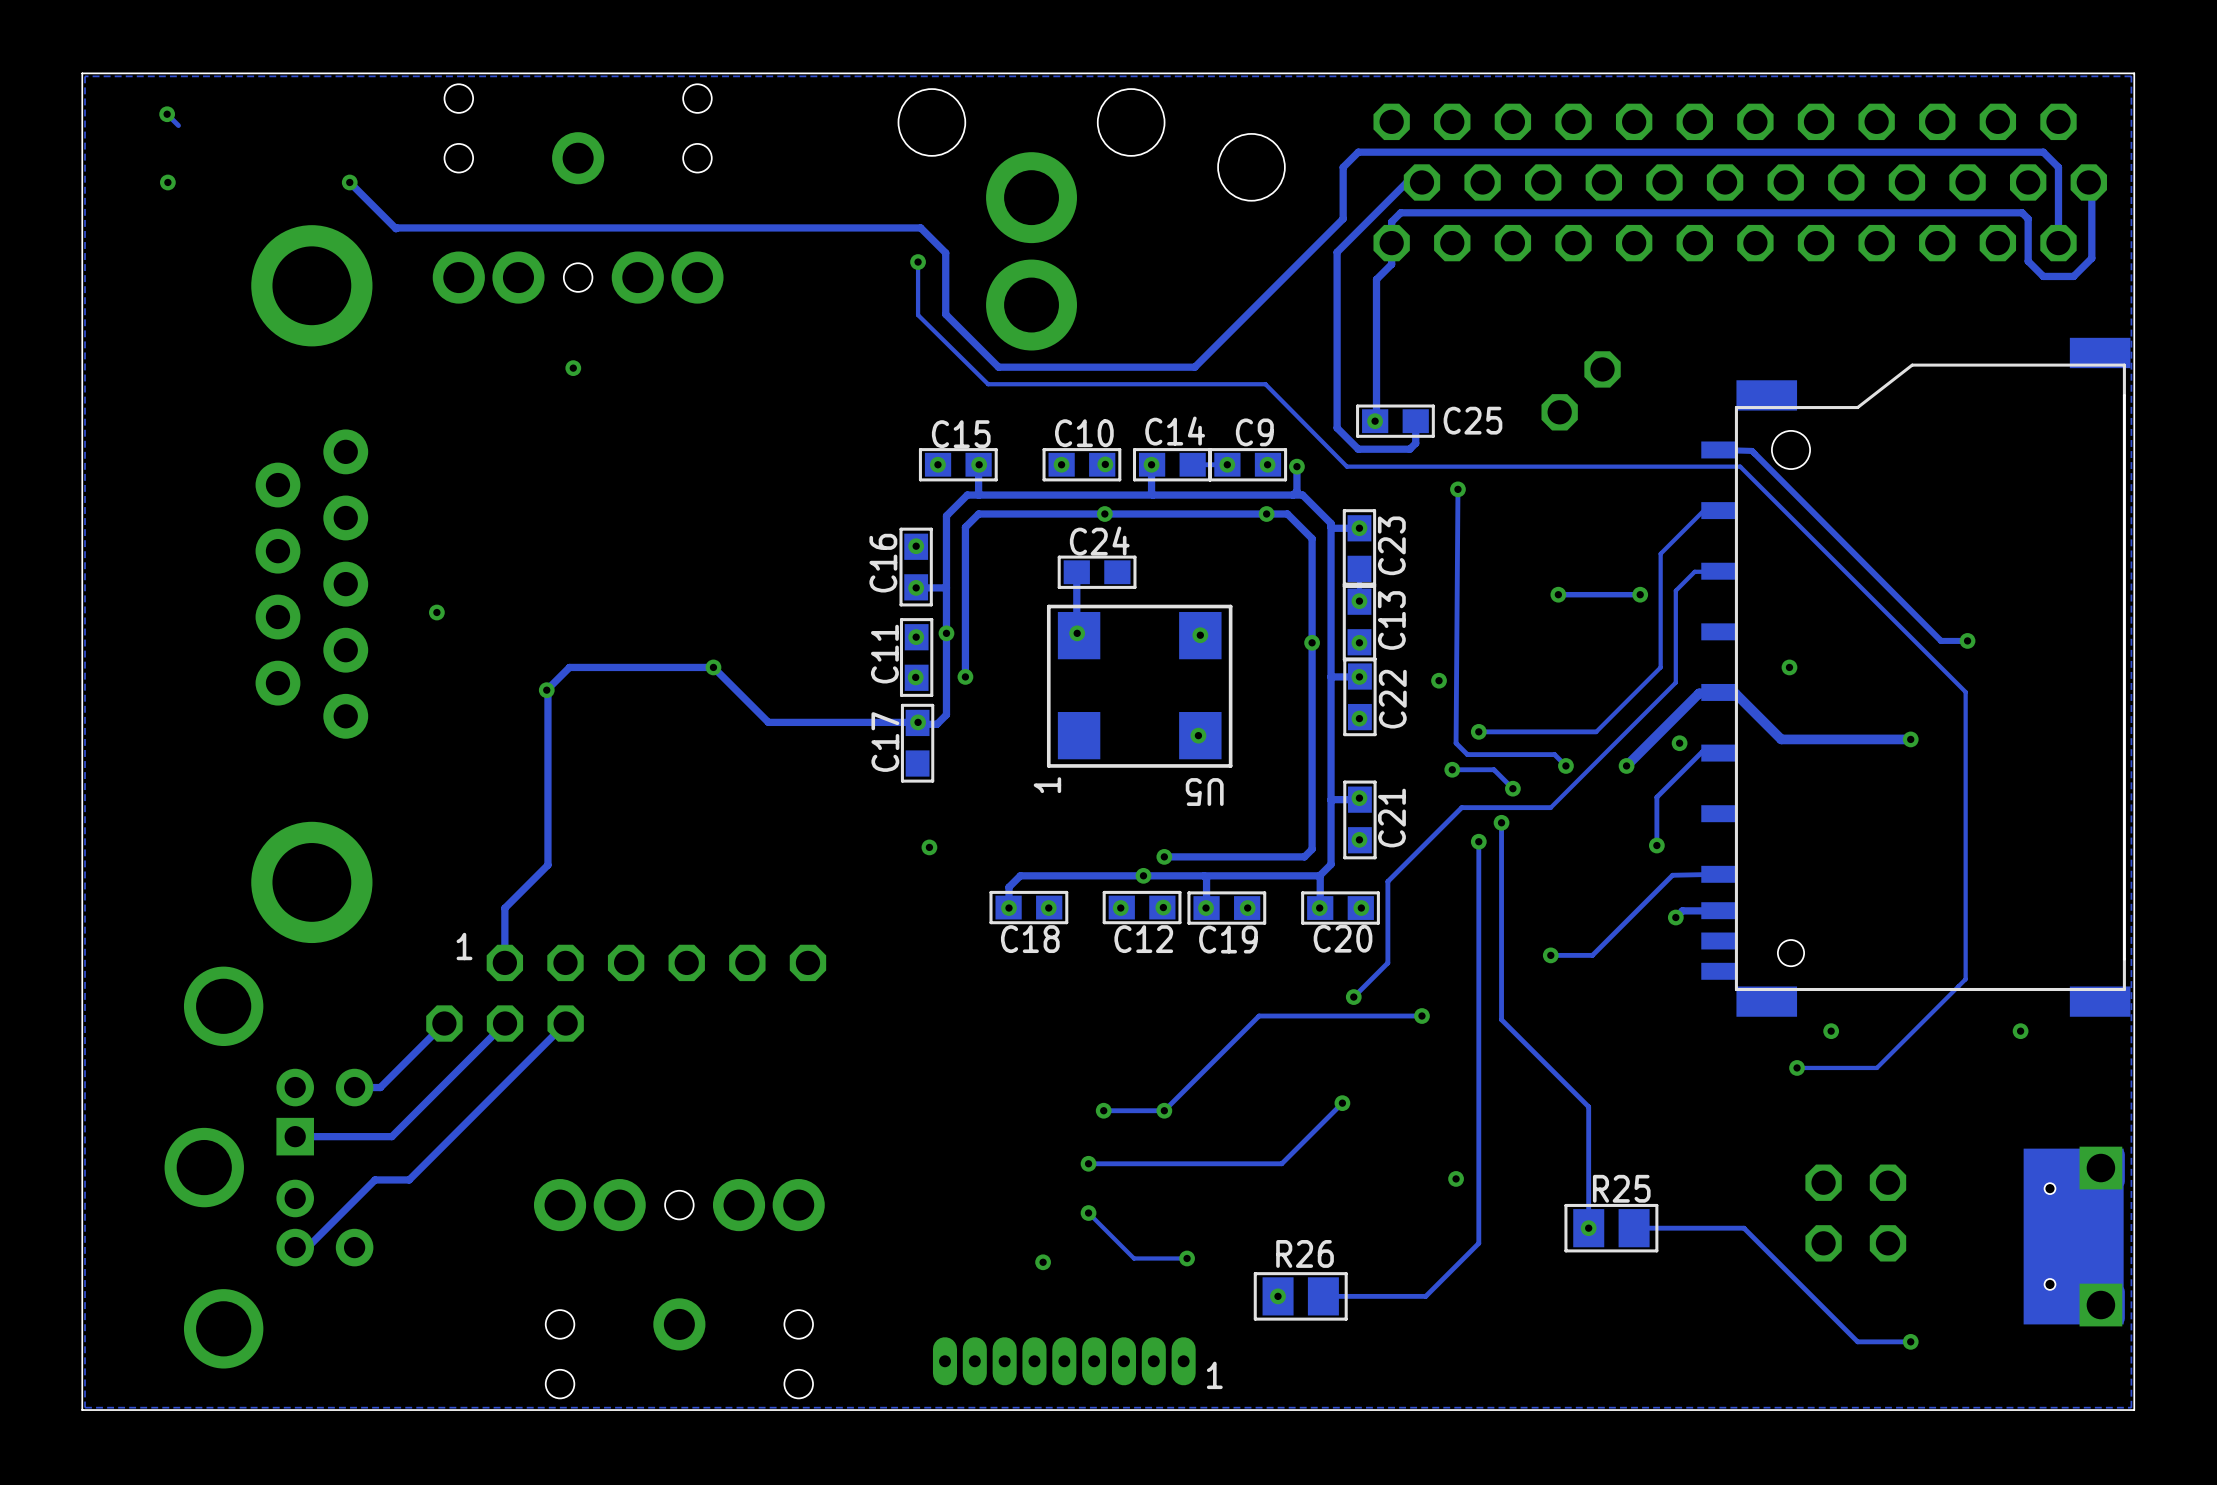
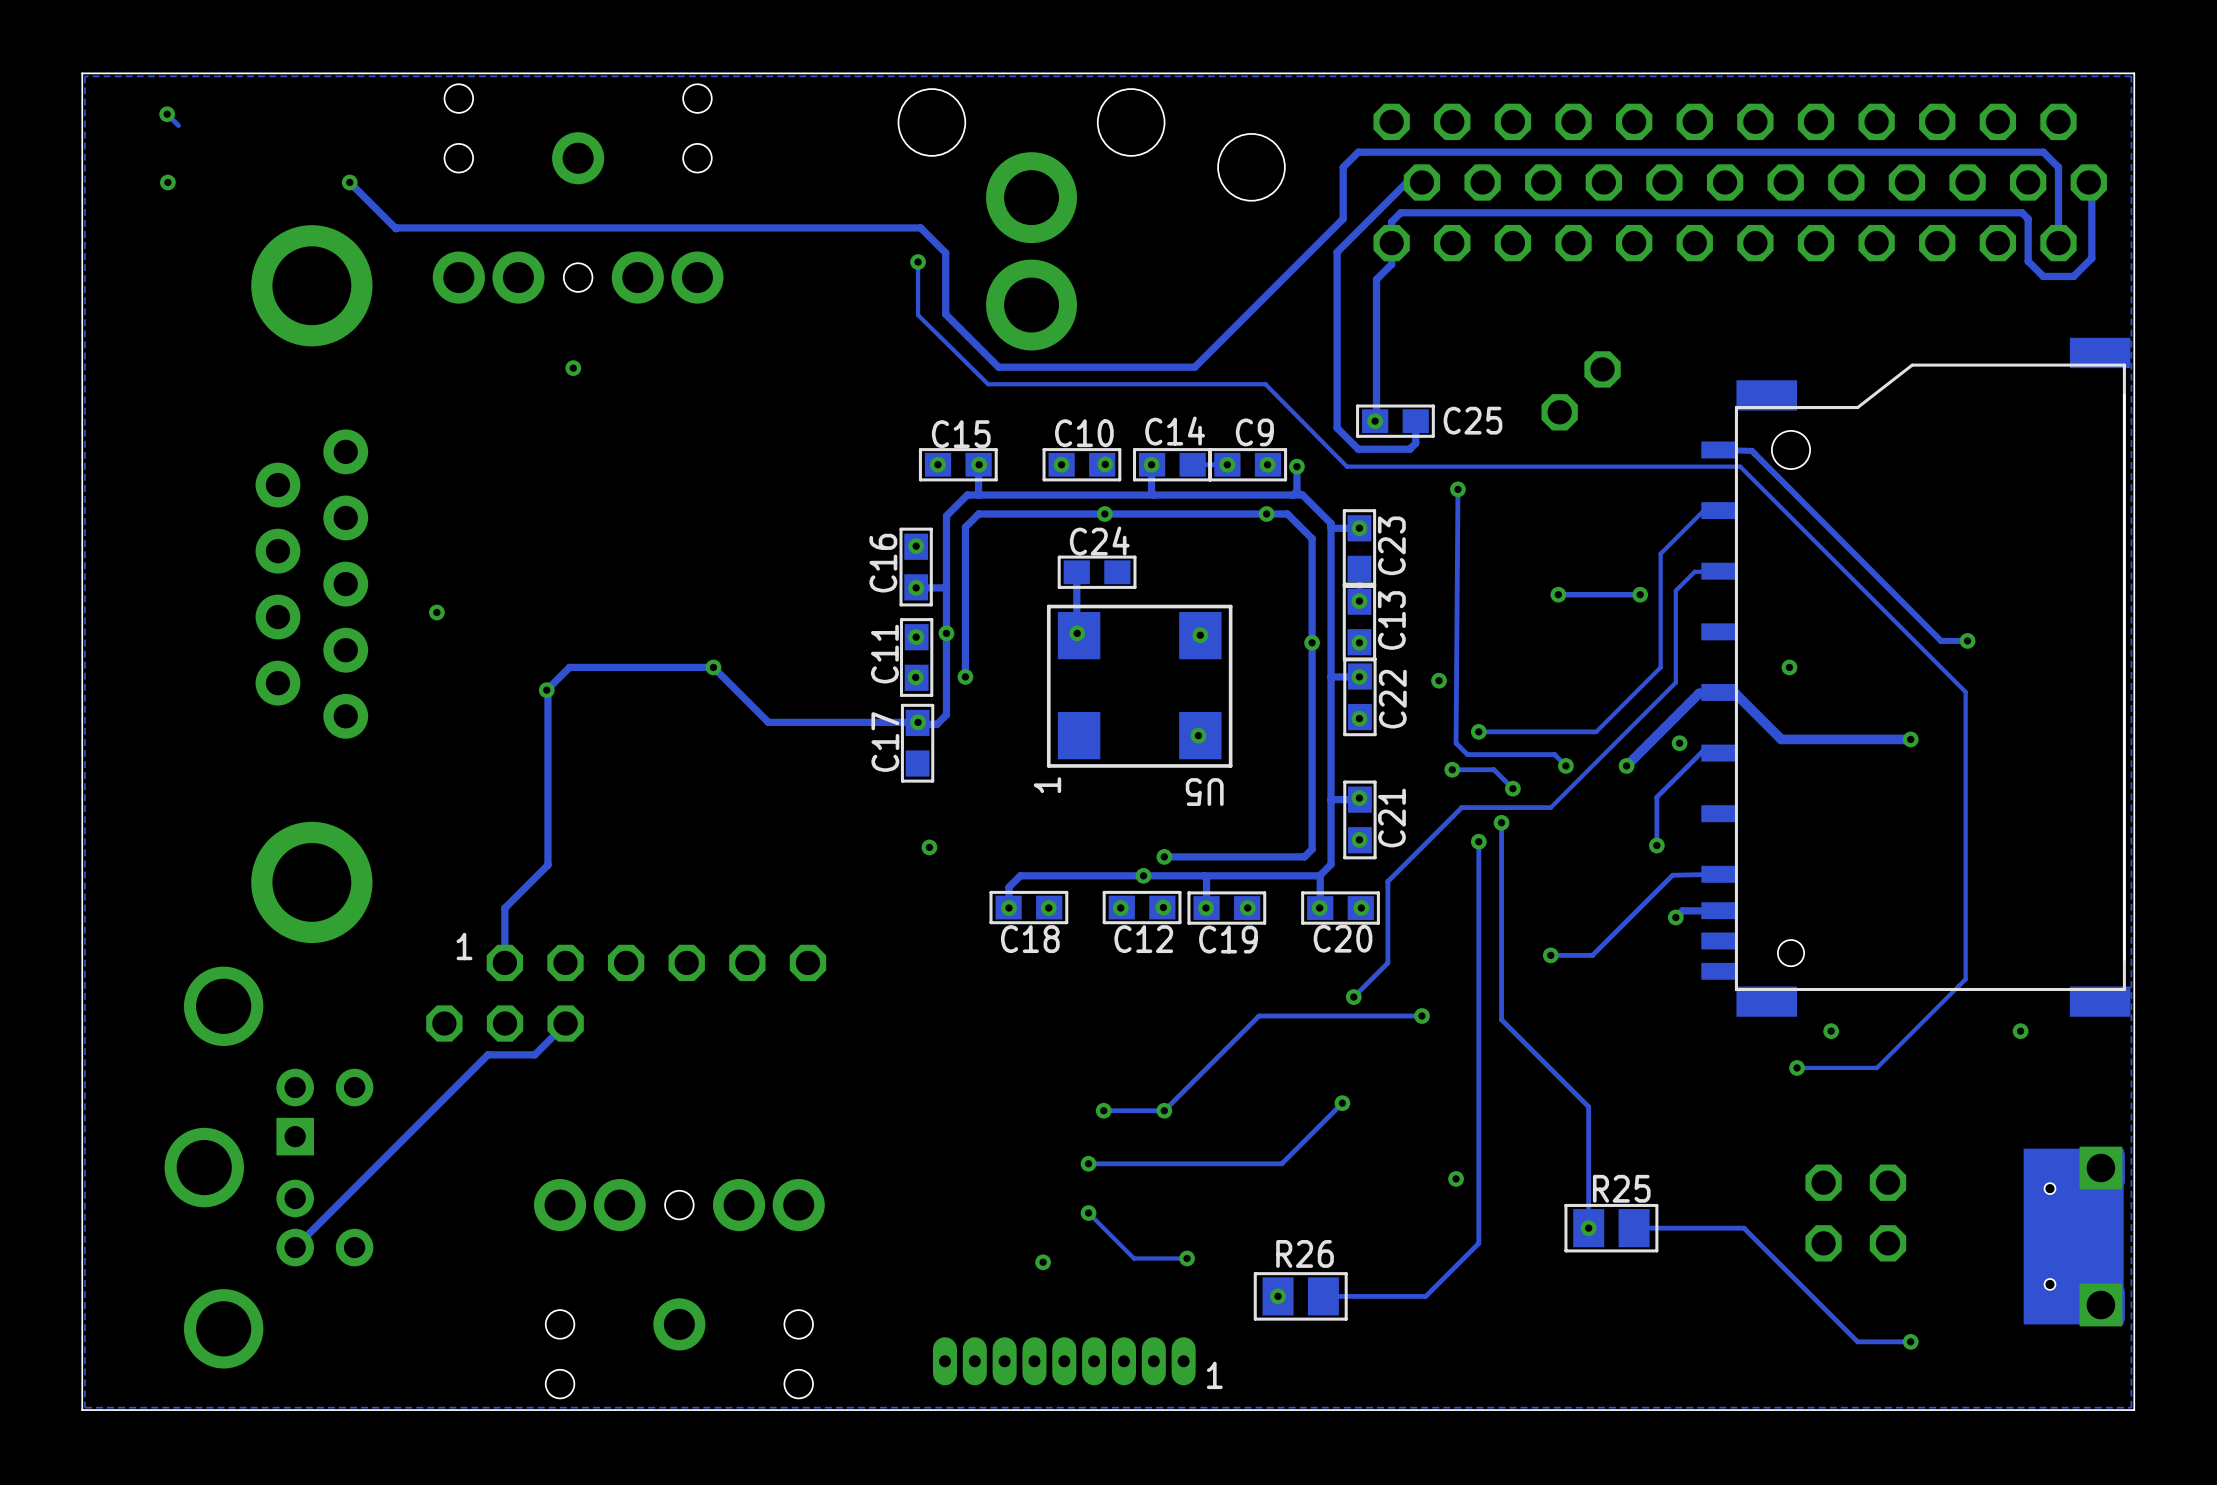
track: (444, 1023) (380, 1087) (354, 1087) -> none
track: (505, 1023) (391, 1136) (295, 1136) -> none
track: (565, 1023) (409, 1179) (375, 1179) (307, 1247) (295, 1247) -> (565, 1023) (534, 1054) (487, 1054) (295, 1247)

